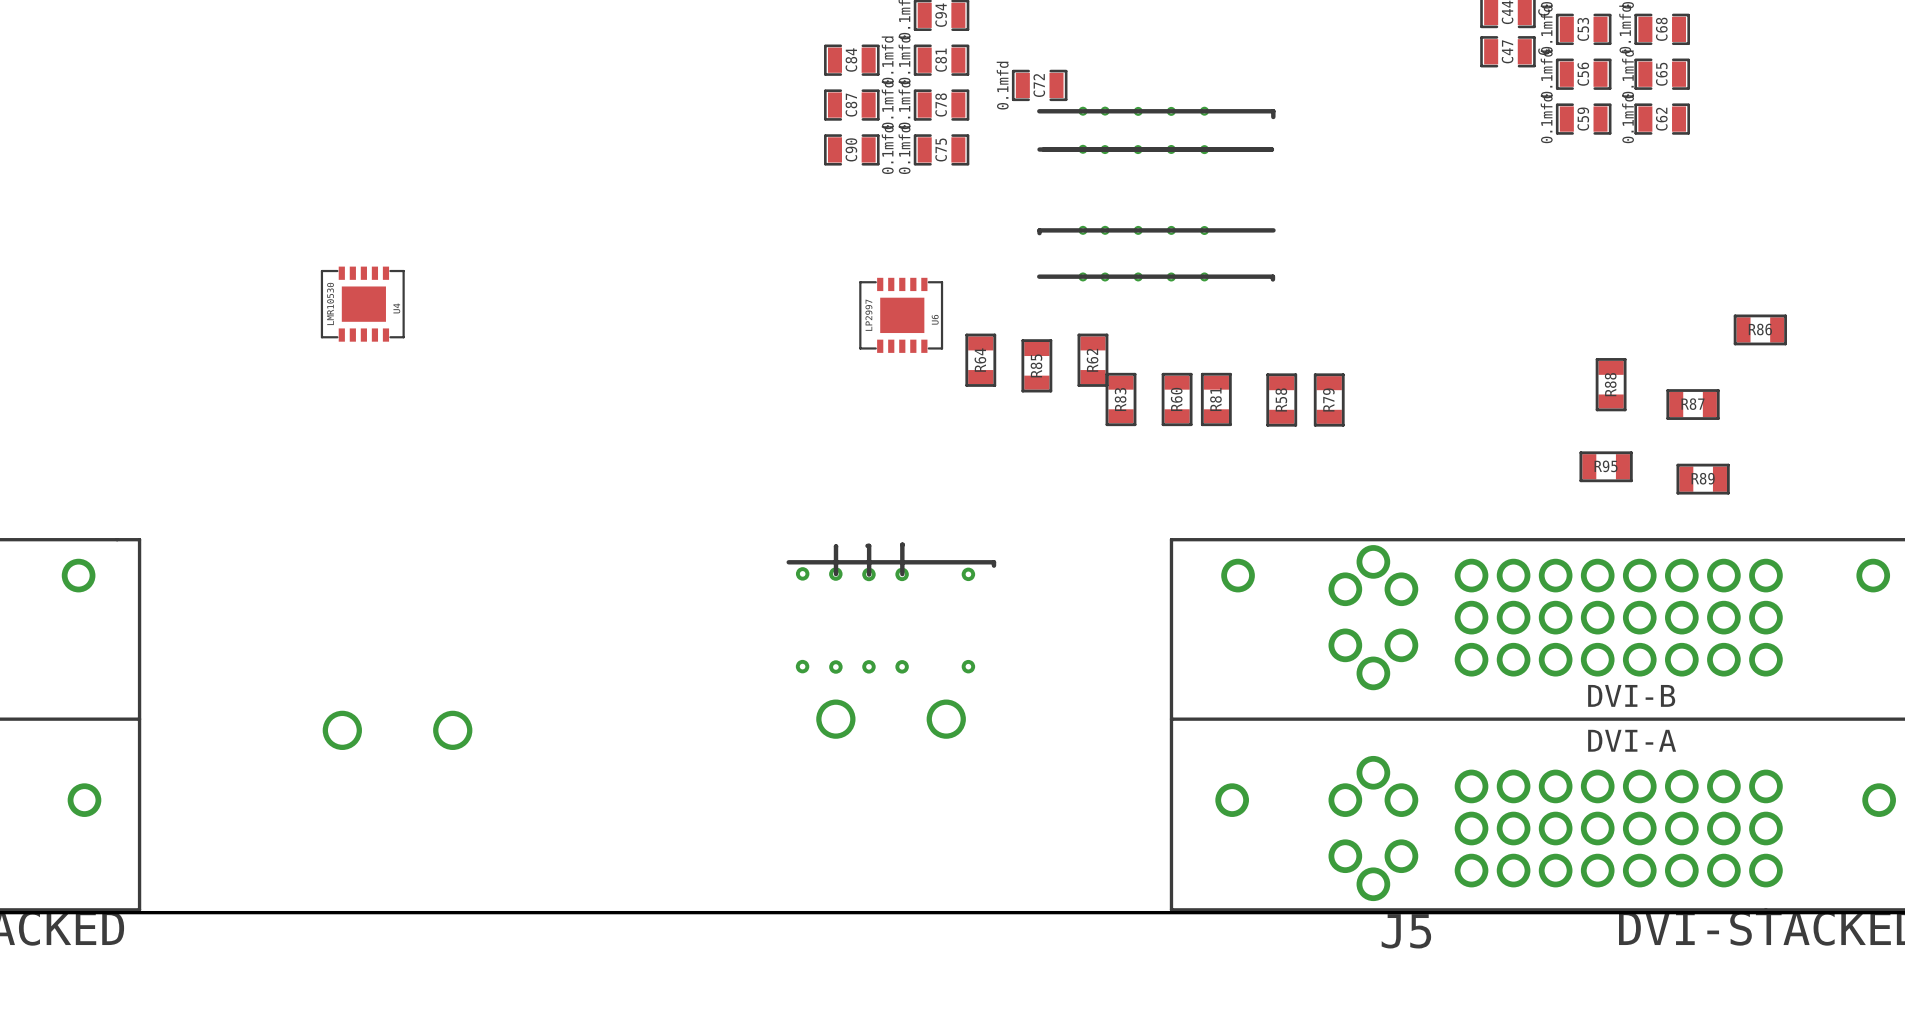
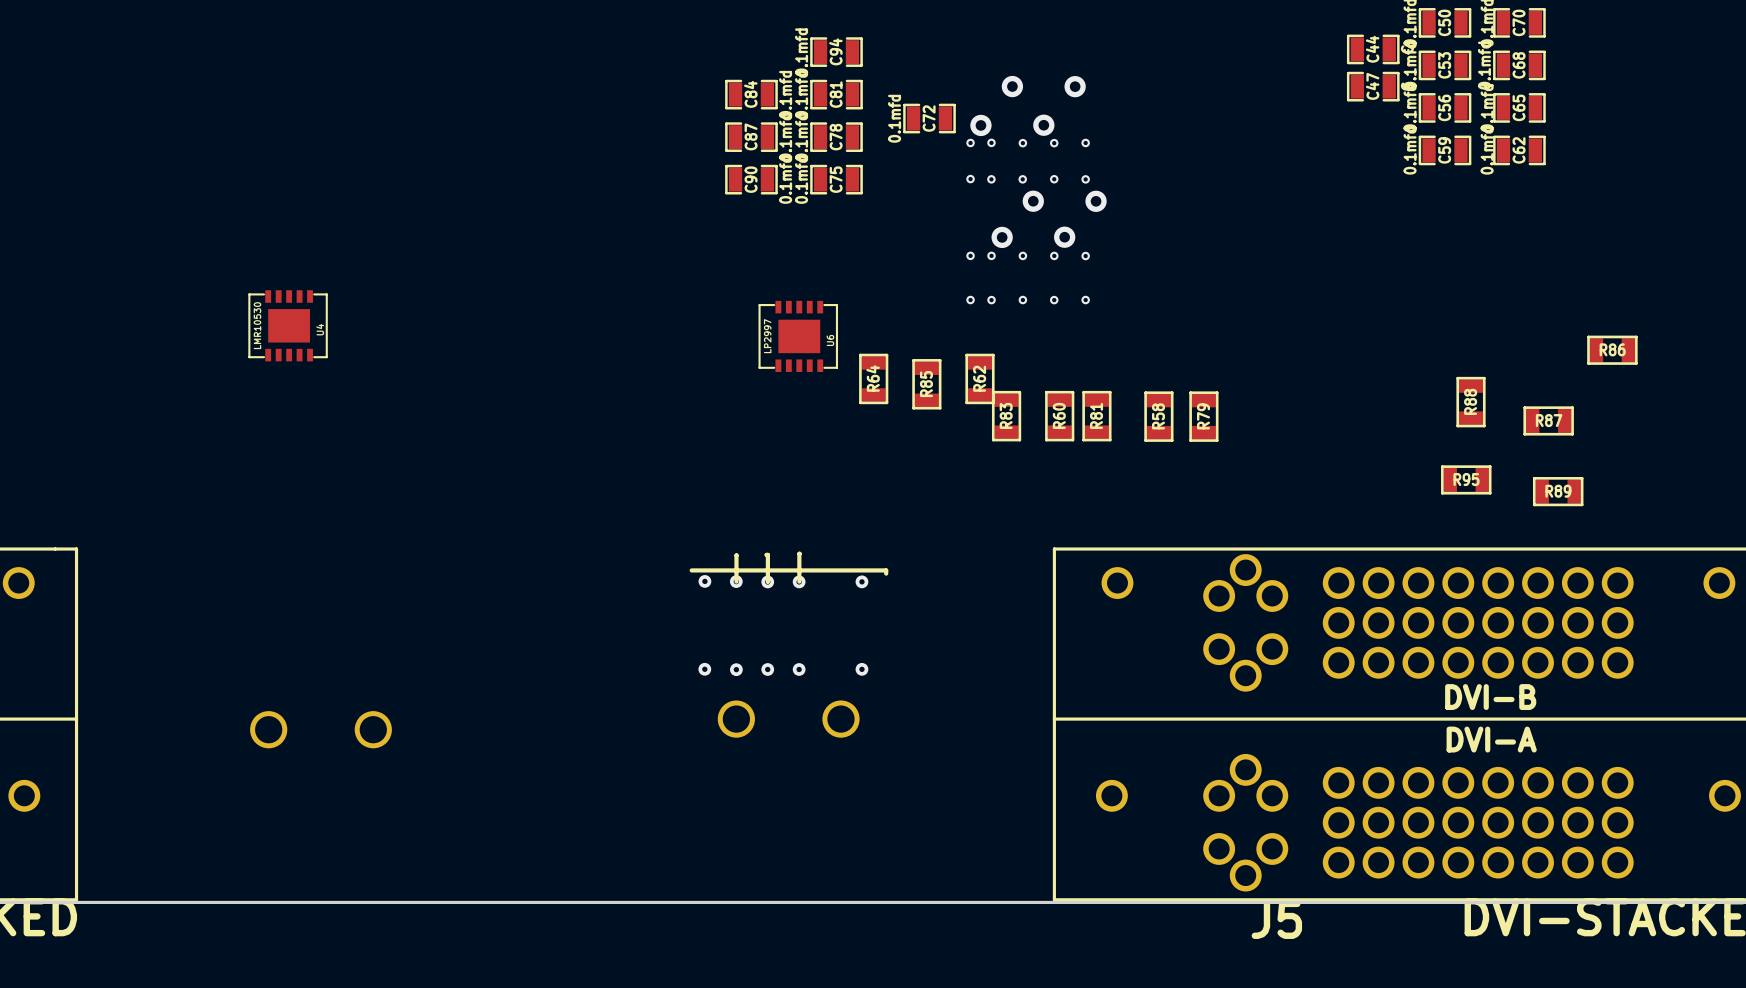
via: none -> (1012, 86)
via: none -> (1075, 86)
via: none -> (980, 125)
via: none -> (1043, 125)
line: (1039, 111) (1273, 111) (1273, 116) -> none
line: (1039, 149) (1271, 149) -> none
via: none -> (1033, 201)
via: none -> (1096, 201)
via: none -> (1002, 237)
via: none -> (1064, 237)
line: (1273, 230) (1039, 230) (1039, 233) -> none
line: (1039, 276) (1272, 276) (1272, 279) -> none

